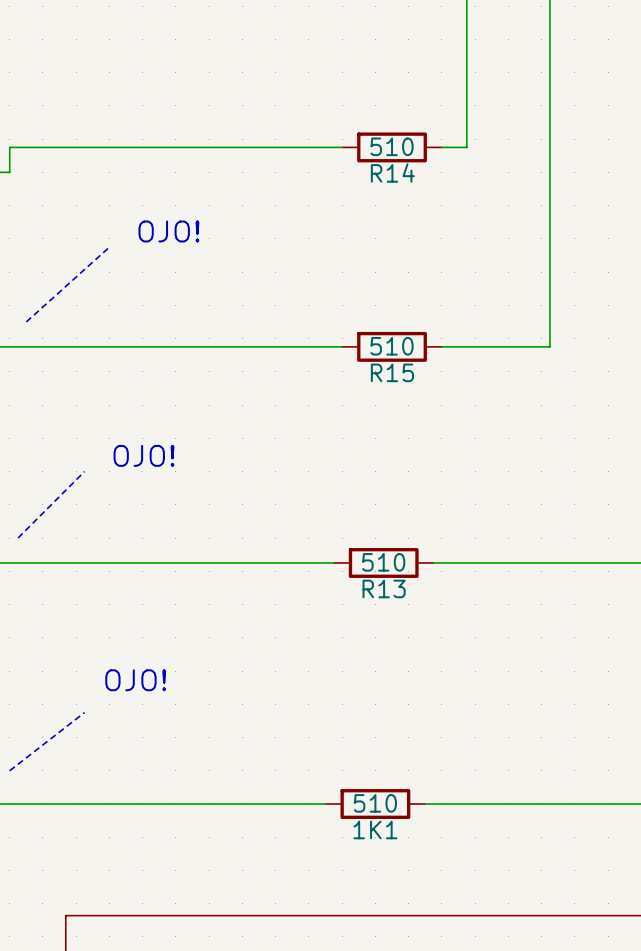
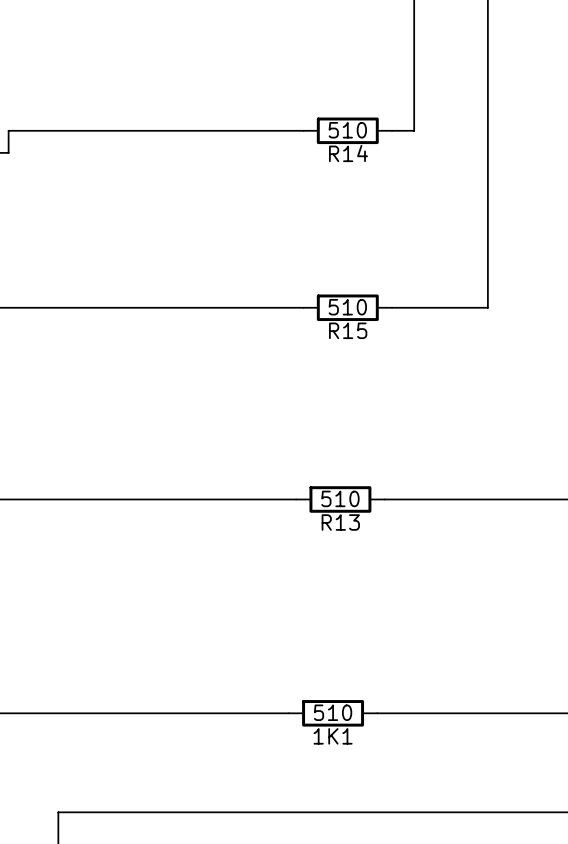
text: OJO! (168, 231) -> none
line: (109, 247) (26, 321) -> none
text: OJO! (144, 455) -> none
line: (84, 471) (18, 538) -> none
text: OJO! (135, 680) -> none
line: (84, 712) (9, 770) -> none

